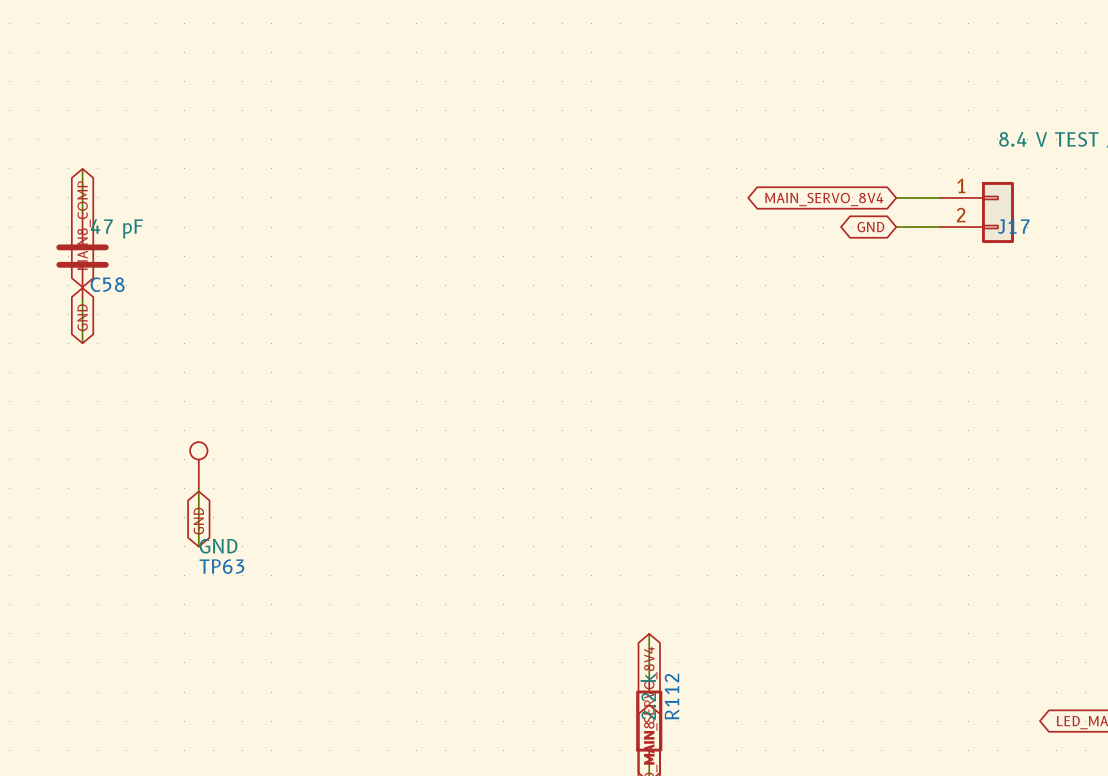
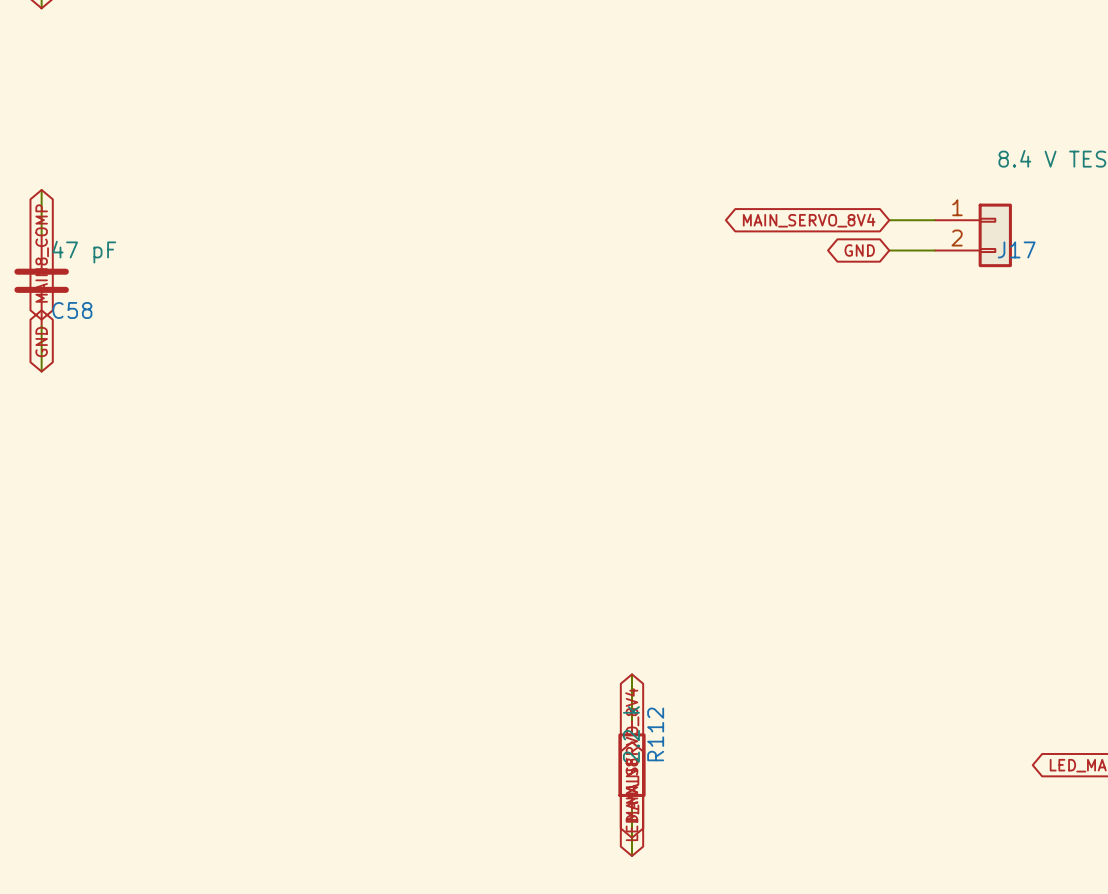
TP63: GND (198, 465) -> none
wire: (198, 488) (198, 546) -> none
global label: GND (198, 521) -> none

